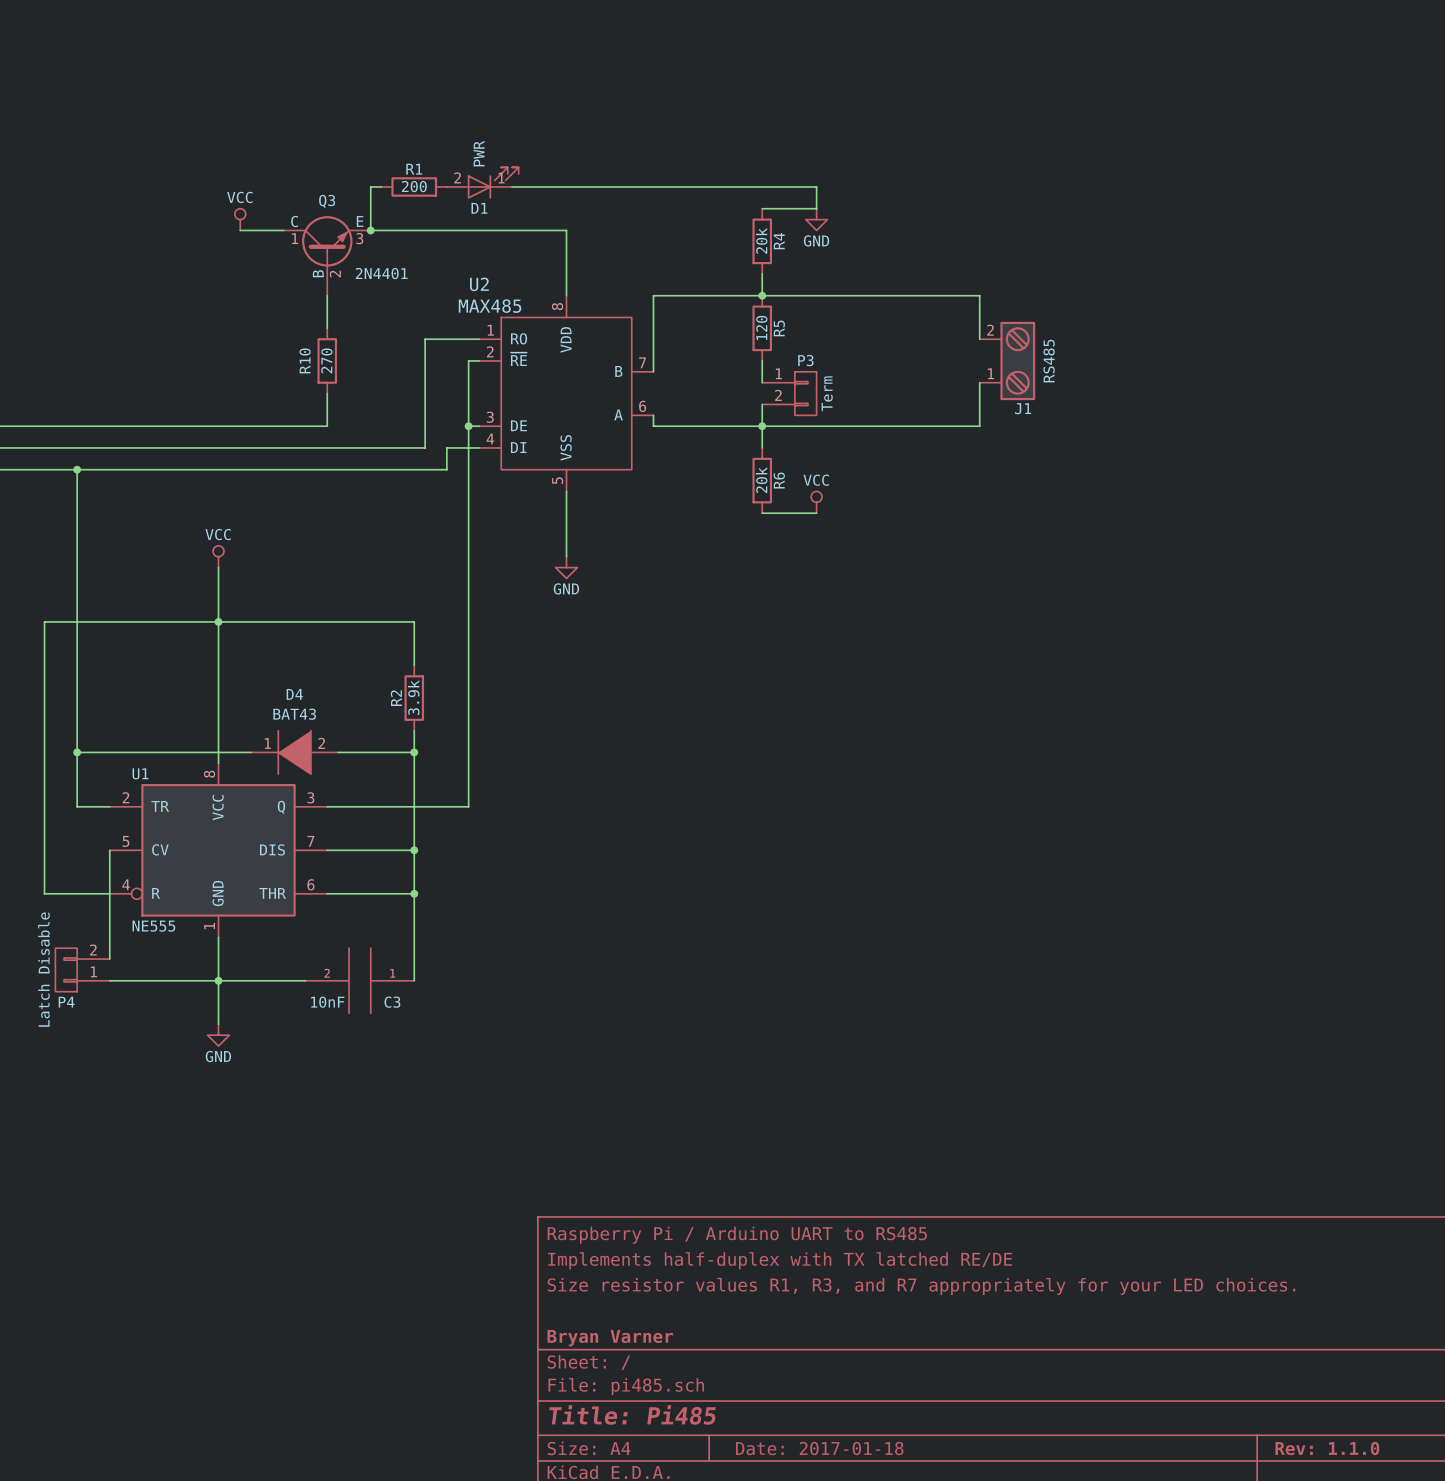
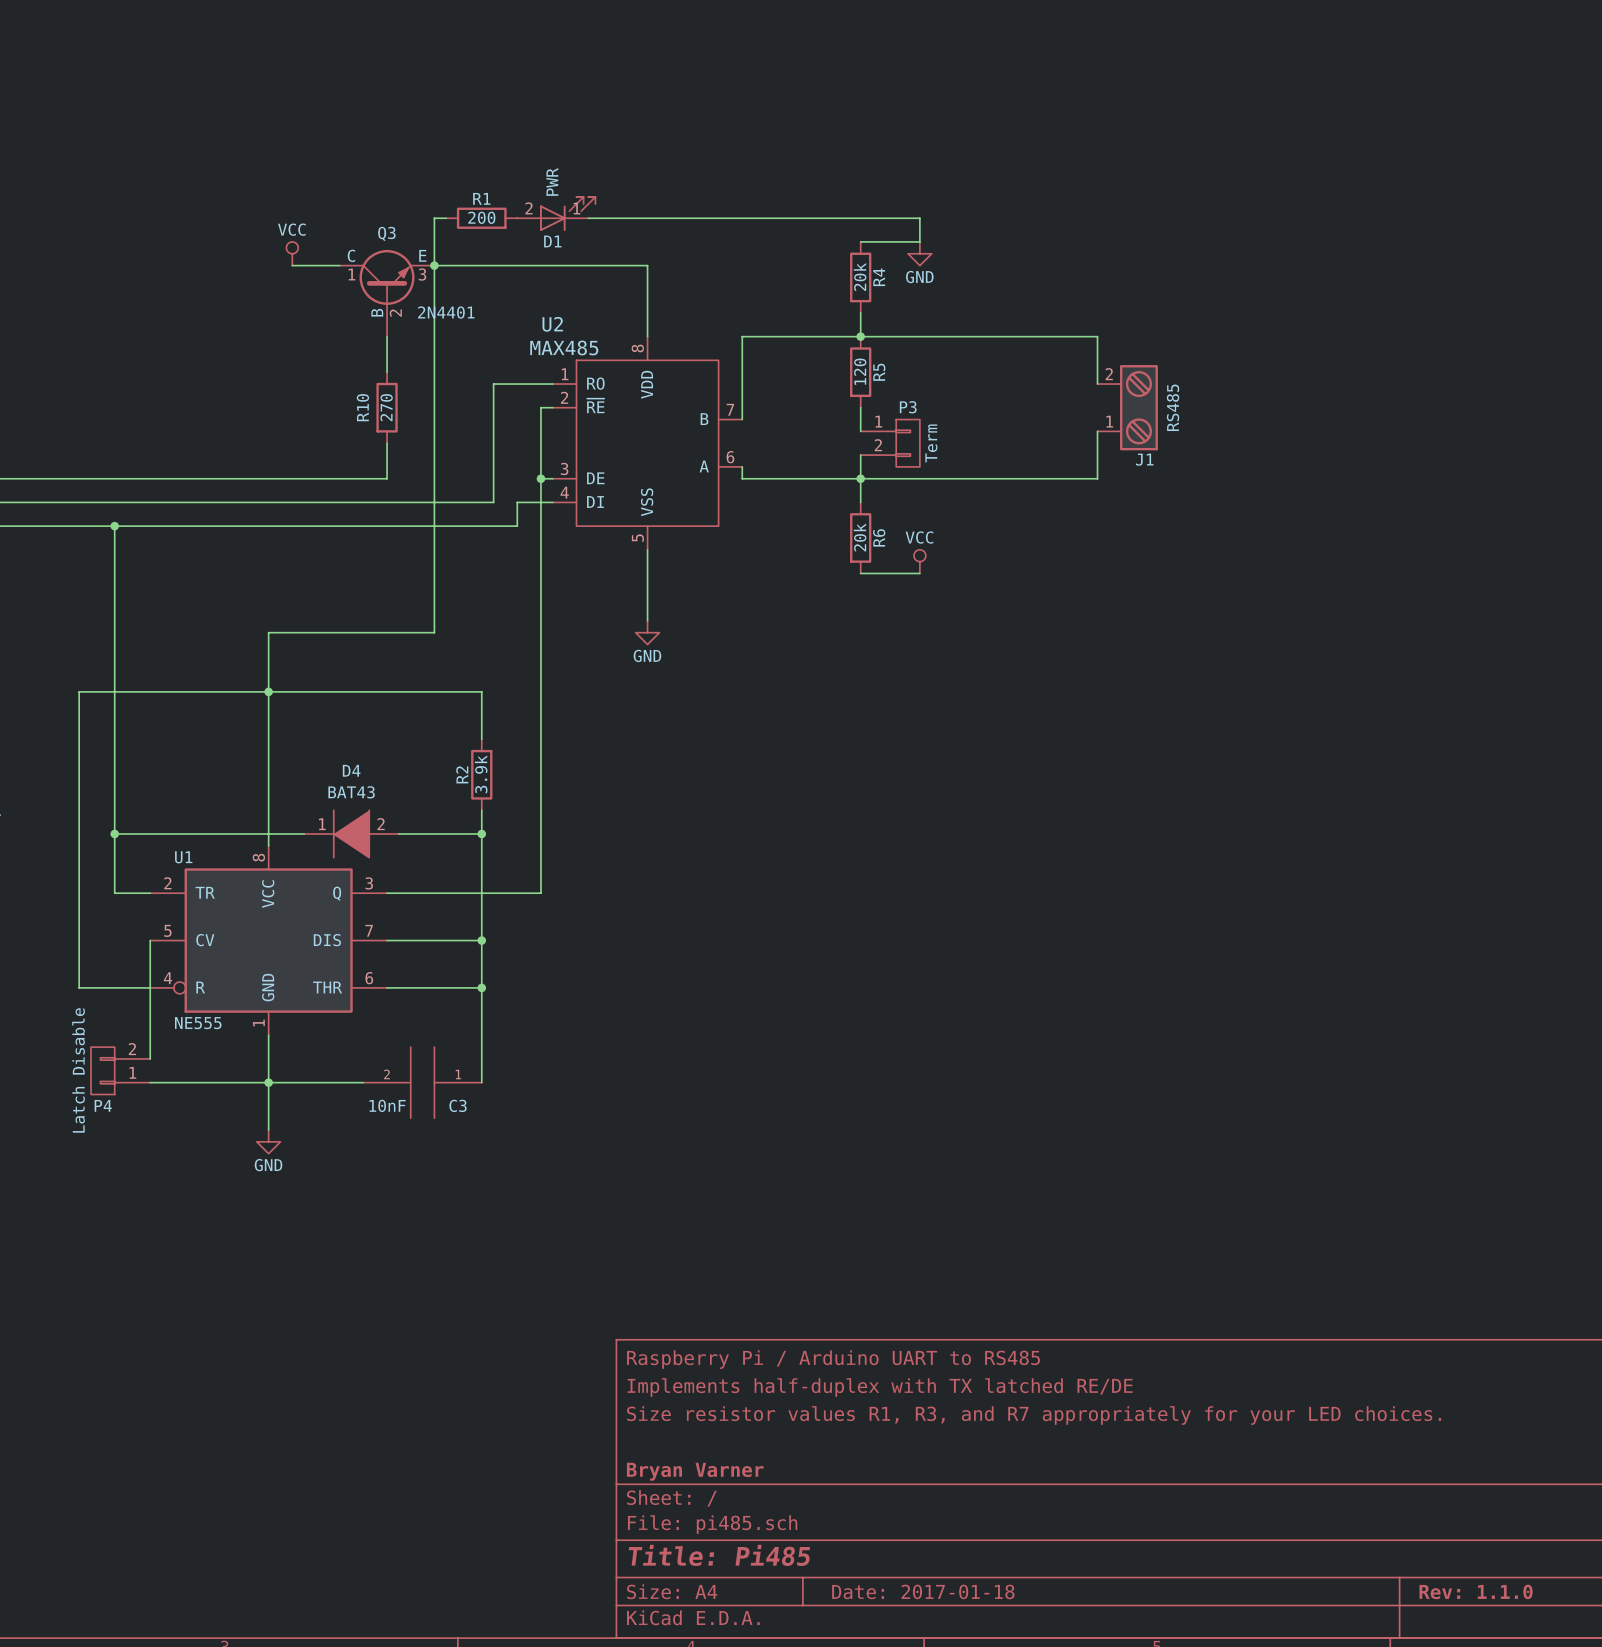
wire: none -> (434, 265) (434, 632) (268, 632)
power symbol: VCC (218, 556) -> none

